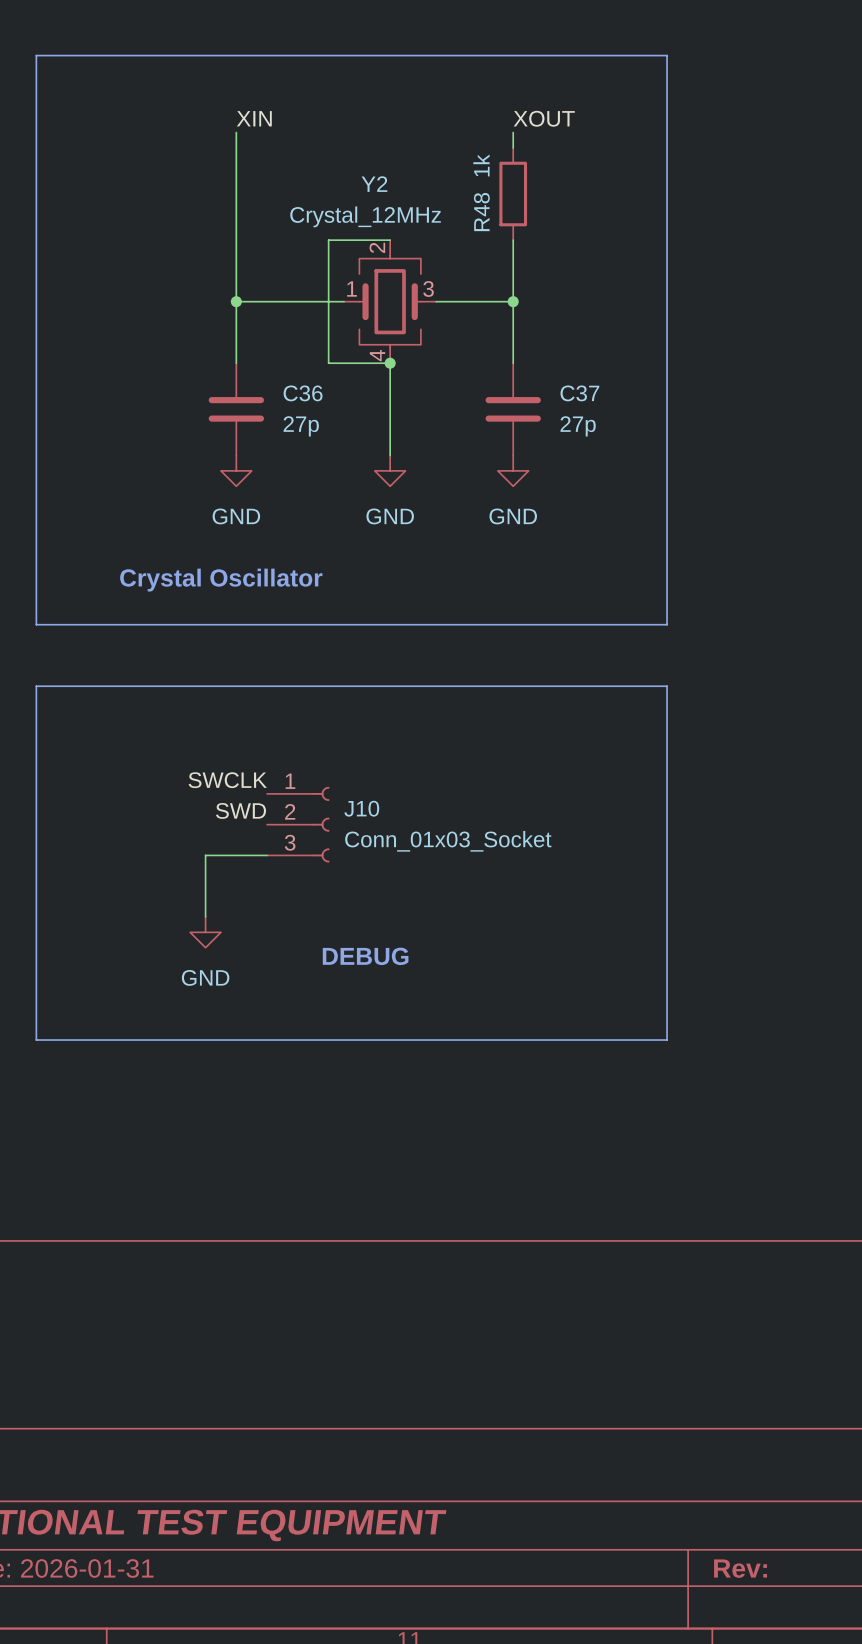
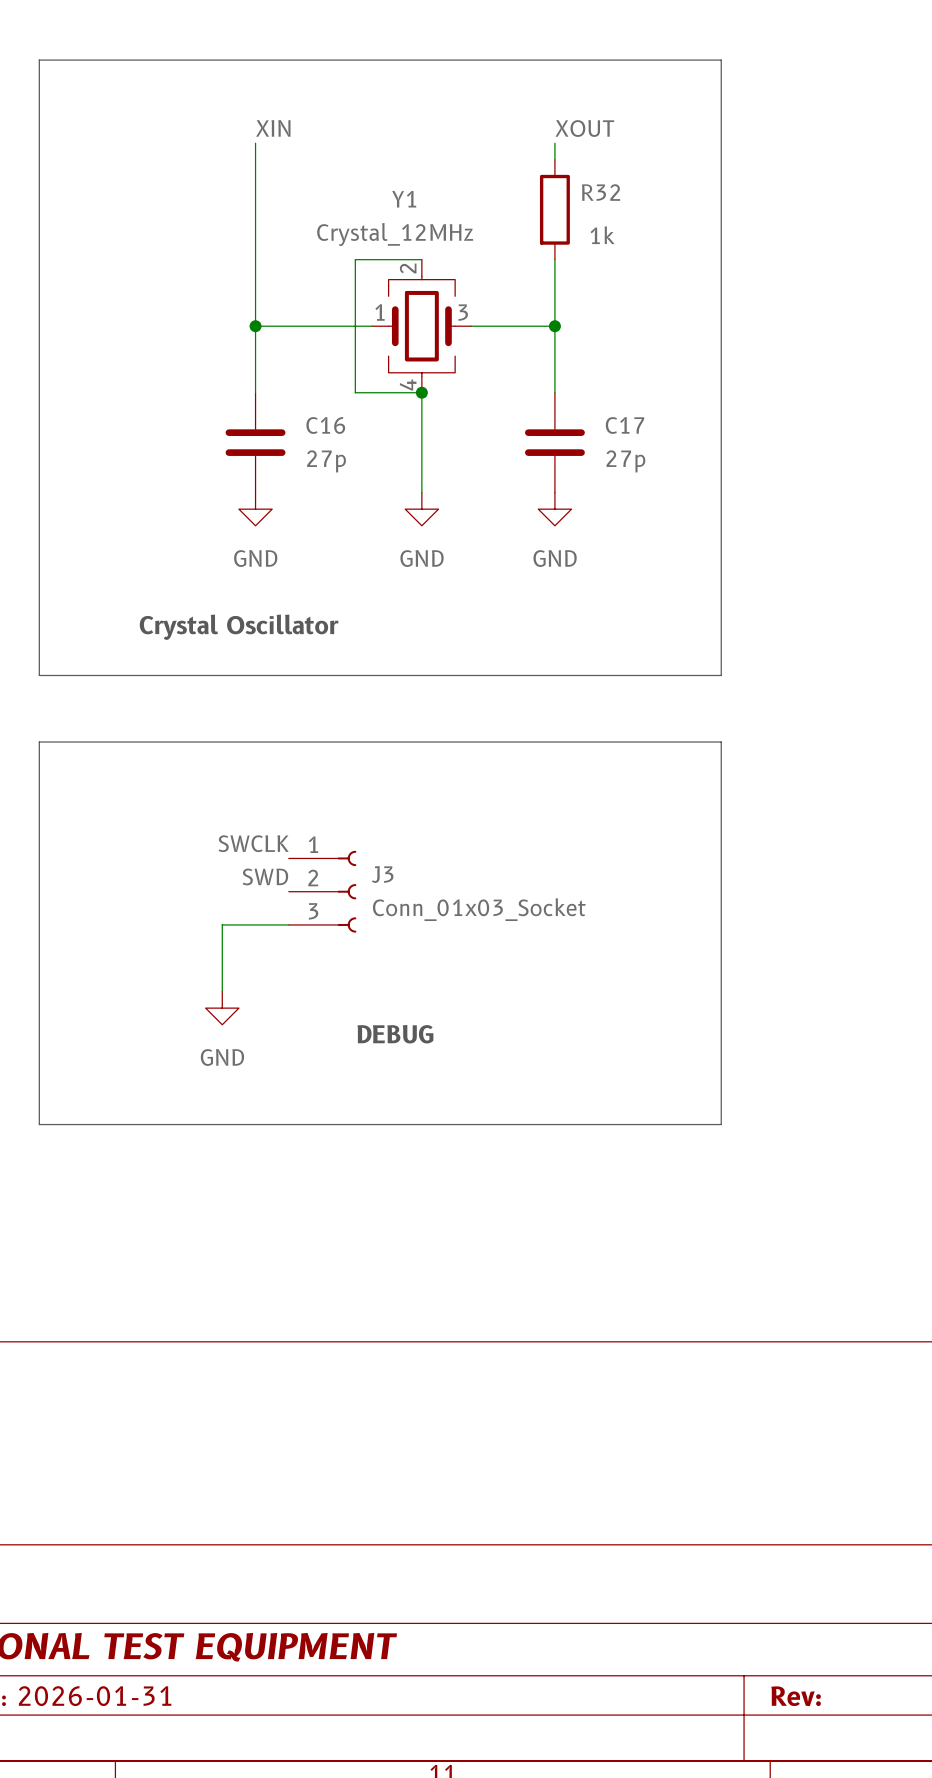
R48 value rotation: 0° (481, 165) -> 90° clockwise (602, 235)
R48 value position: 1k (481, 165) -> 1k (602, 235)
Y2 name: Y2 (374, 184) -> Y1 (404, 199)
R48 name: R48 (481, 212) -> R32 (601, 192)
C36 name: C36 (303, 393) -> C16 (325, 425)
C37 name: C37 (579, 393) -> C17 (625, 425)
J10 name: J10 (361, 808) -> J3 (382, 874)

